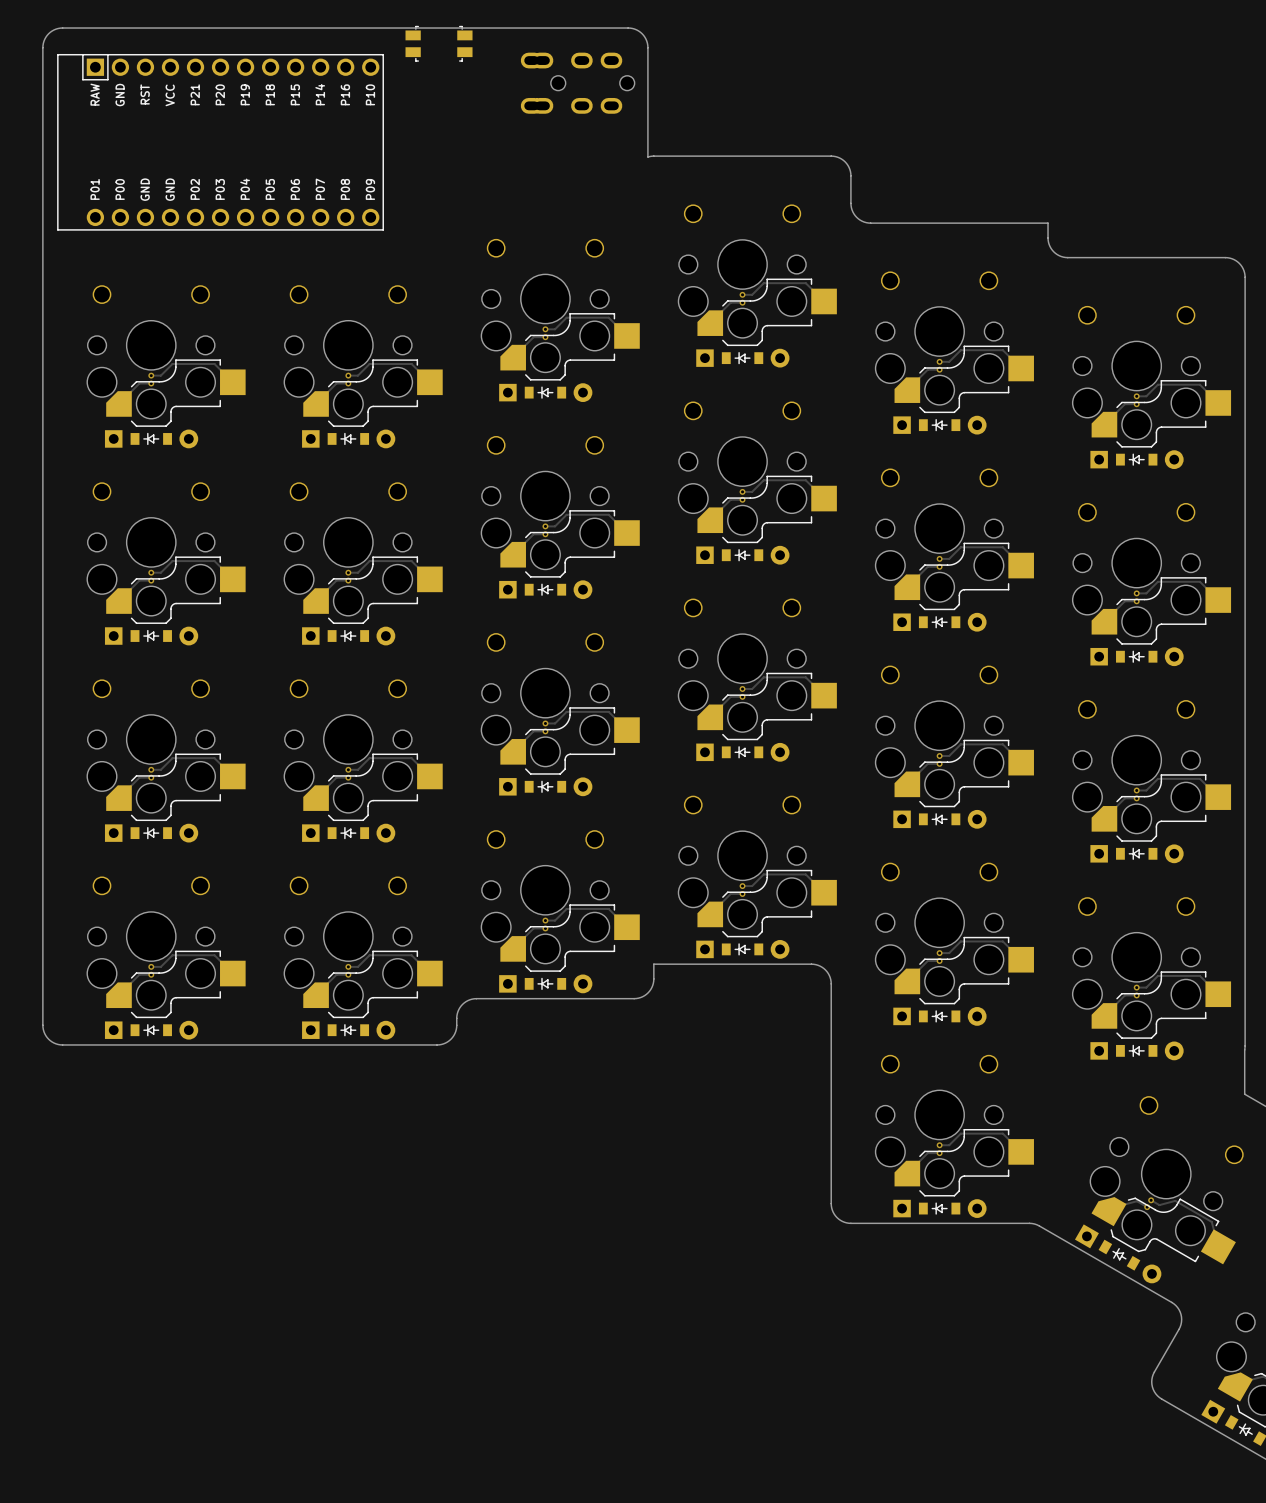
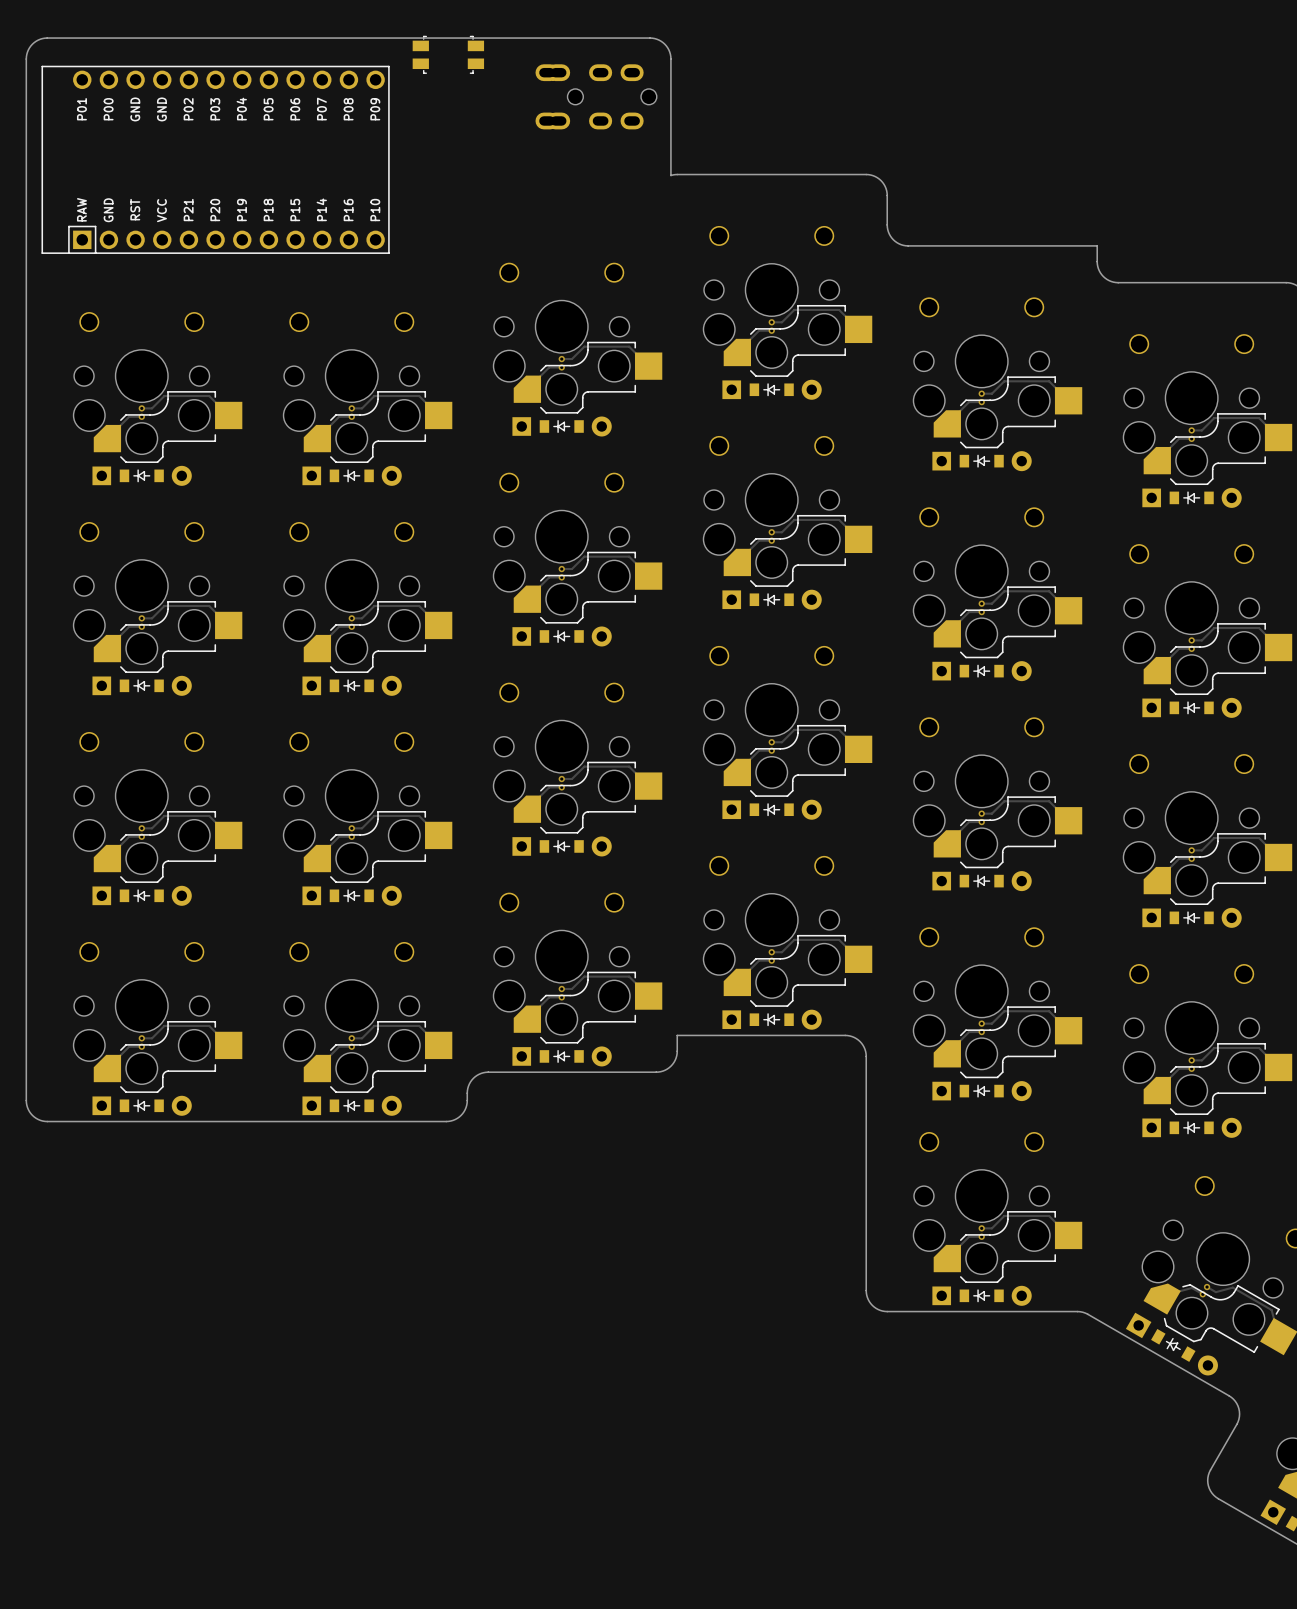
part footprint: [57, 53, 384, 231] -> [41, 65, 390, 254]

